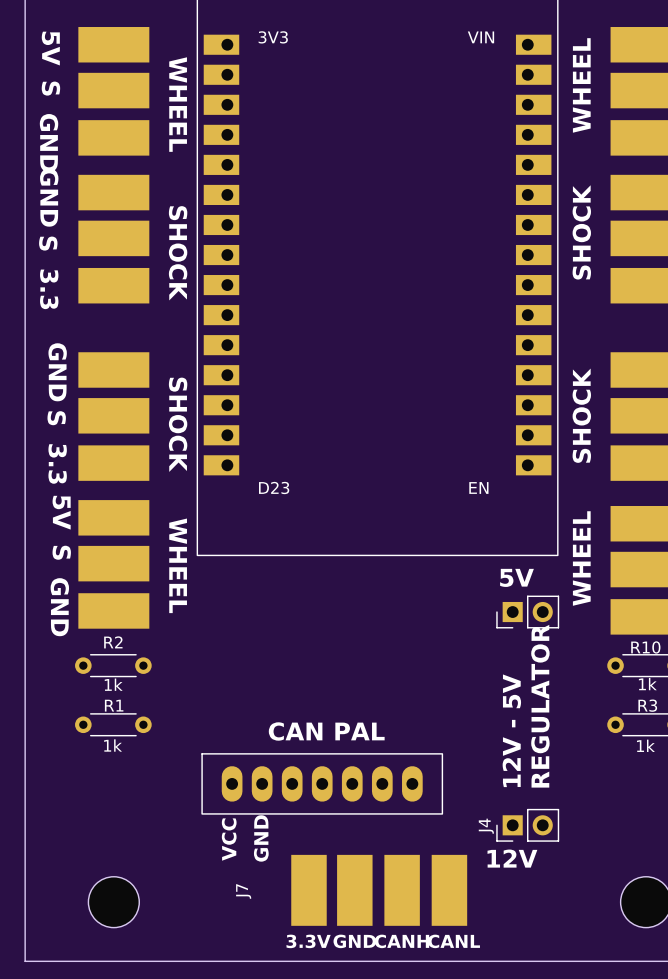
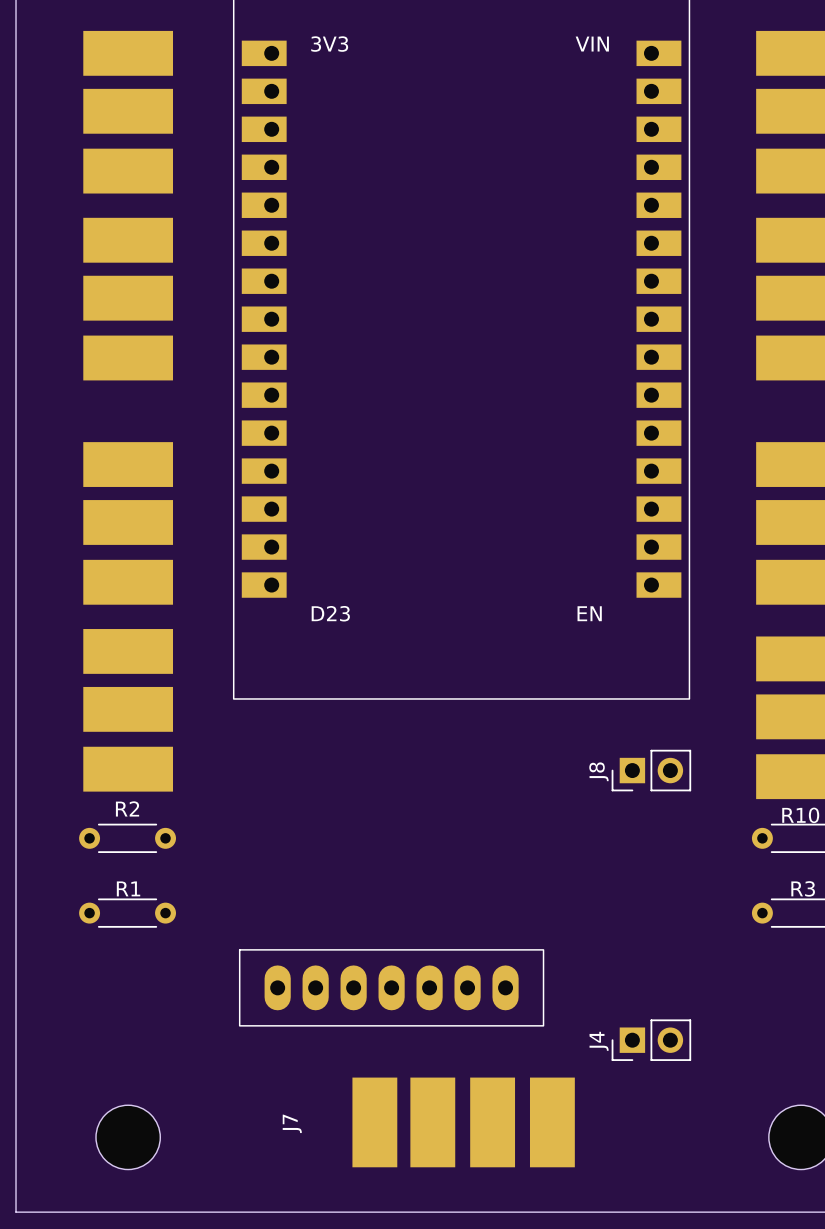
text: 5V (50, 48) -> none
text: WHEEL (581, 85) -> none
text: S (50, 88) -> none
text: WHEEL (178, 104) -> none
text: GND (49, 143) -> none
text: GND (49, 197) -> none
text: SHOCK (581, 232) -> none
text: S (48, 243) -> none
text: SHOCK (178, 253) -> none
text: 3.3 (49, 289) -> none
text: GND (57, 372) -> none
text: SHOCK (581, 415) -> none
text: S (56, 418) -> none
text: SHOCK (178, 424) -> none
text: 3.3 (57, 463) -> none
text: 5V (61, 512) -> none
text: S (61, 552) -> none
text: WHEEL (581, 558) -> none
text: WHEEL (178, 565) -> none
text: 5V (516, 577) -> none
text: GND (59, 607) -> none
J8 name: none -> J8 (598, 771)
text: 1k (113, 684) -> none
text: 1k (647, 684) -> none
text: REGULATOR (540, 706) -> none
text: 12V - 5V (511, 730) -> none
text: CAN PAL (326, 731) -> none
text: 1k (113, 745) -> none
text: 1k (645, 745) -> none
text: GND (261, 838) -> none
text: VCC (229, 839) -> none
text: 12V (512, 858) -> none
text: 3.3V (308, 941) -> none
text: GND (354, 941) -> none
text: CANH (402, 941) -> none
text: CANL (454, 941) -> none

